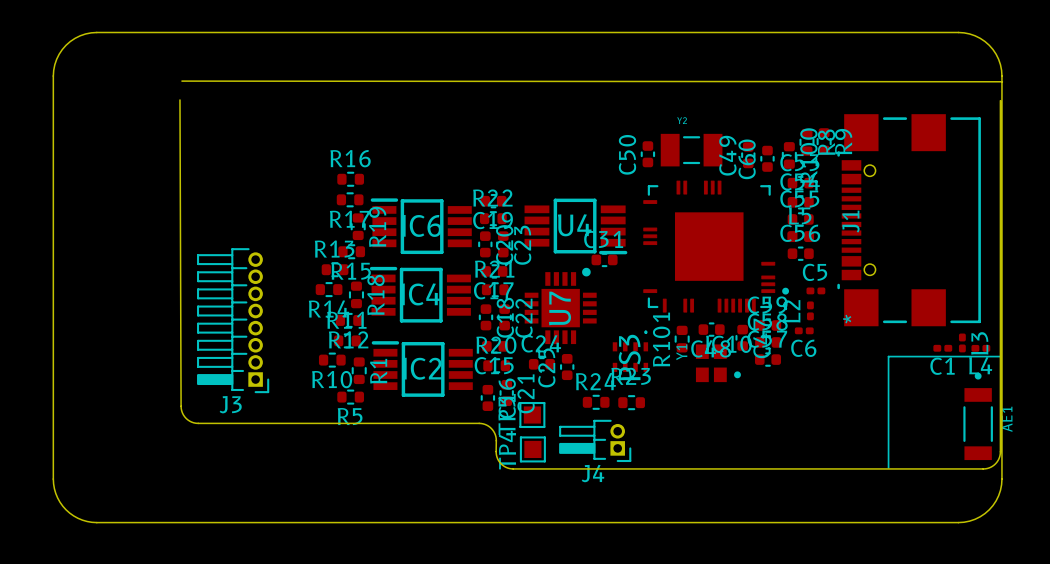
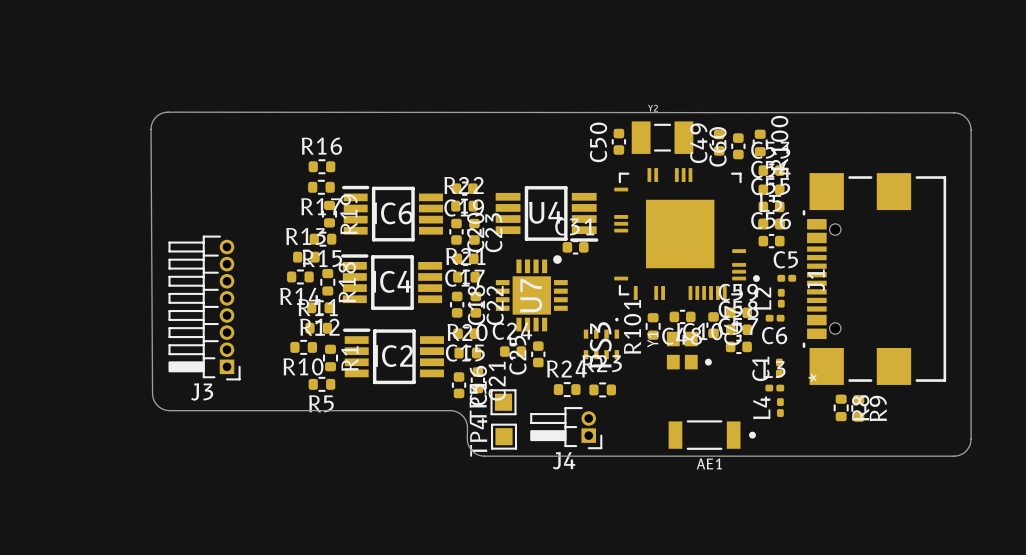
board edge: (96, 32) (958, 32) (980, 38) (996, 54) (1001, 76) (1001, 479) (996, 500) (980, 516) (958, 522) (96, 522) (77, 518) (66, 509) (60, 502) (55, 493) (53, 479) (53, 76) (56, 59) (66, 45) (80, 35) (96, 32) -> none
board edge: (181, 81) (1002, 81) -> none
board edge: (179, 99) (181, 406) -> (971, 129) (966, 117) (953, 112) (162, 113) (154, 118) (151, 129) (152, 393)
board edge: (1000, 100) (1000, 142) -> none
R9 position: (824, 141) -> (858, 408)
R8 position: (807, 142) -> (841, 407)
J1 position: (909, 220) -> (874, 279)
L3 rotation: 0° (962, 342) -> 90° clockwise (774, 388)
L3 position: (962, 342) -> (774, 388)
C1 rotation: 0° (942, 348) -> 90° clockwise (779, 368)
C1 position: (942, 348) -> (779, 368)
L4 rotation: 0° (980, 348) -> 90° clockwise (780, 407)
L4 position: (980, 348) -> (780, 407)
line: (999, 356) (888, 356) (888, 467) -> none
AE1 rotation: 0° (978, 416) -> 90° clockwise (712, 435)
AE1 position: (978, 416) -> (712, 435)

